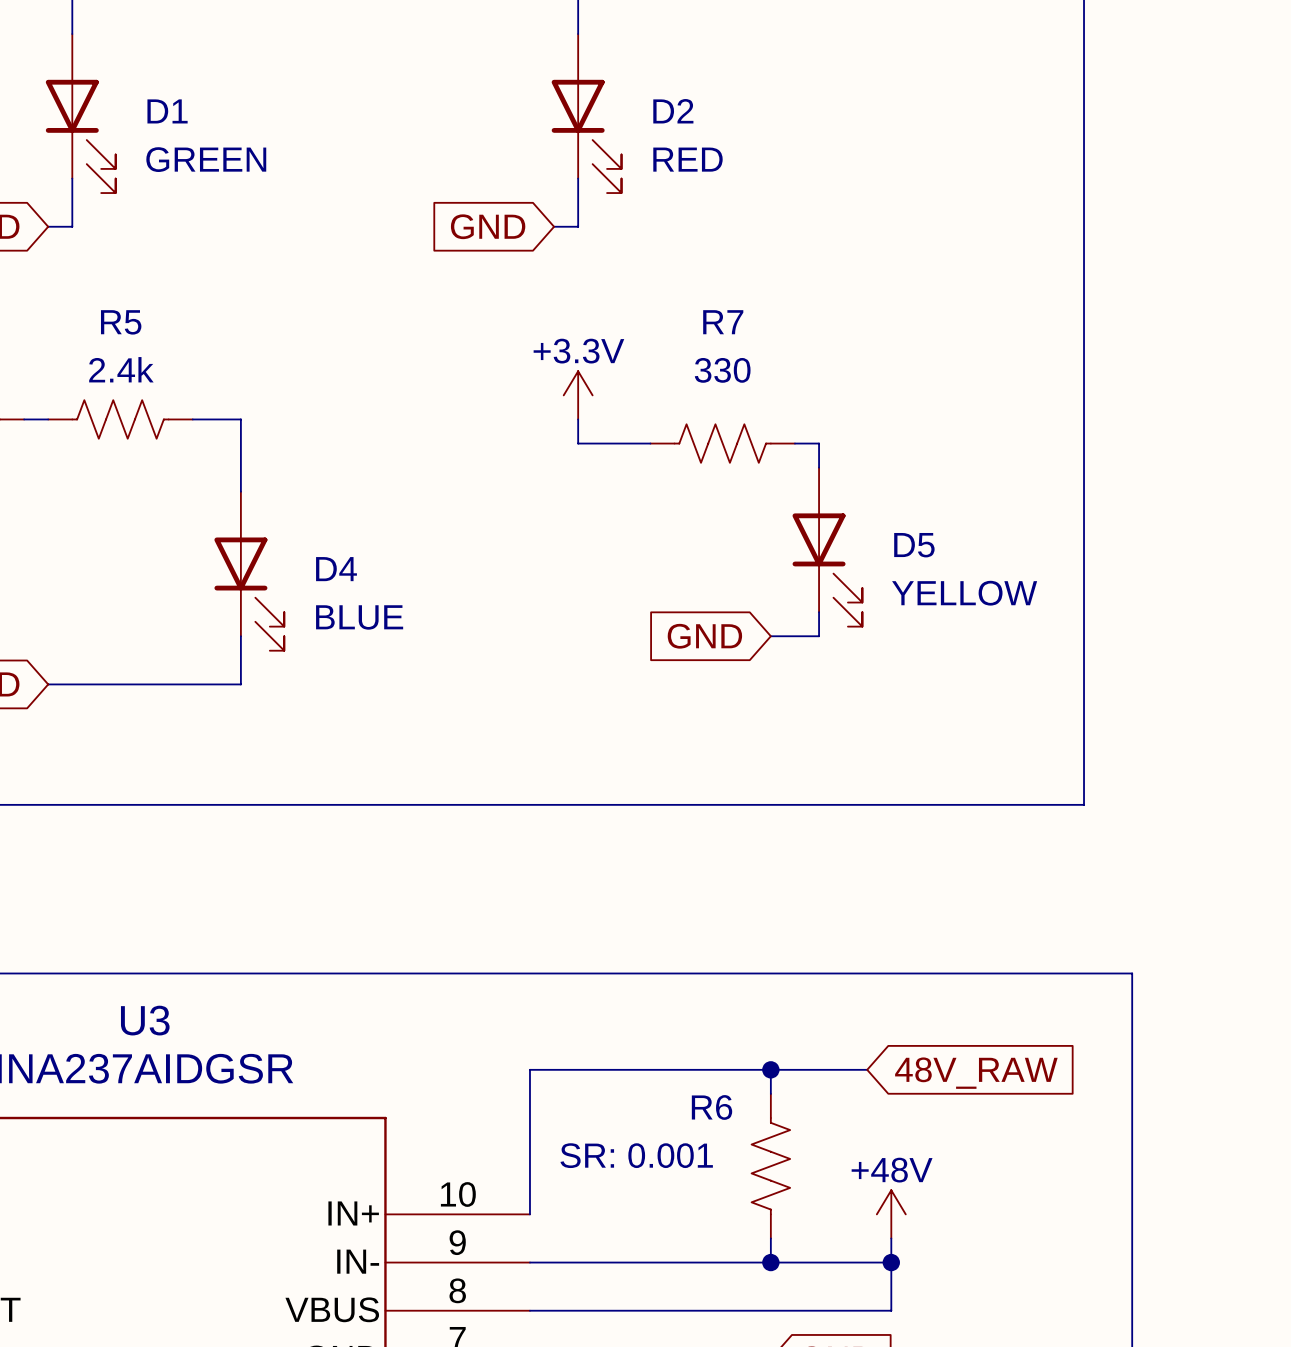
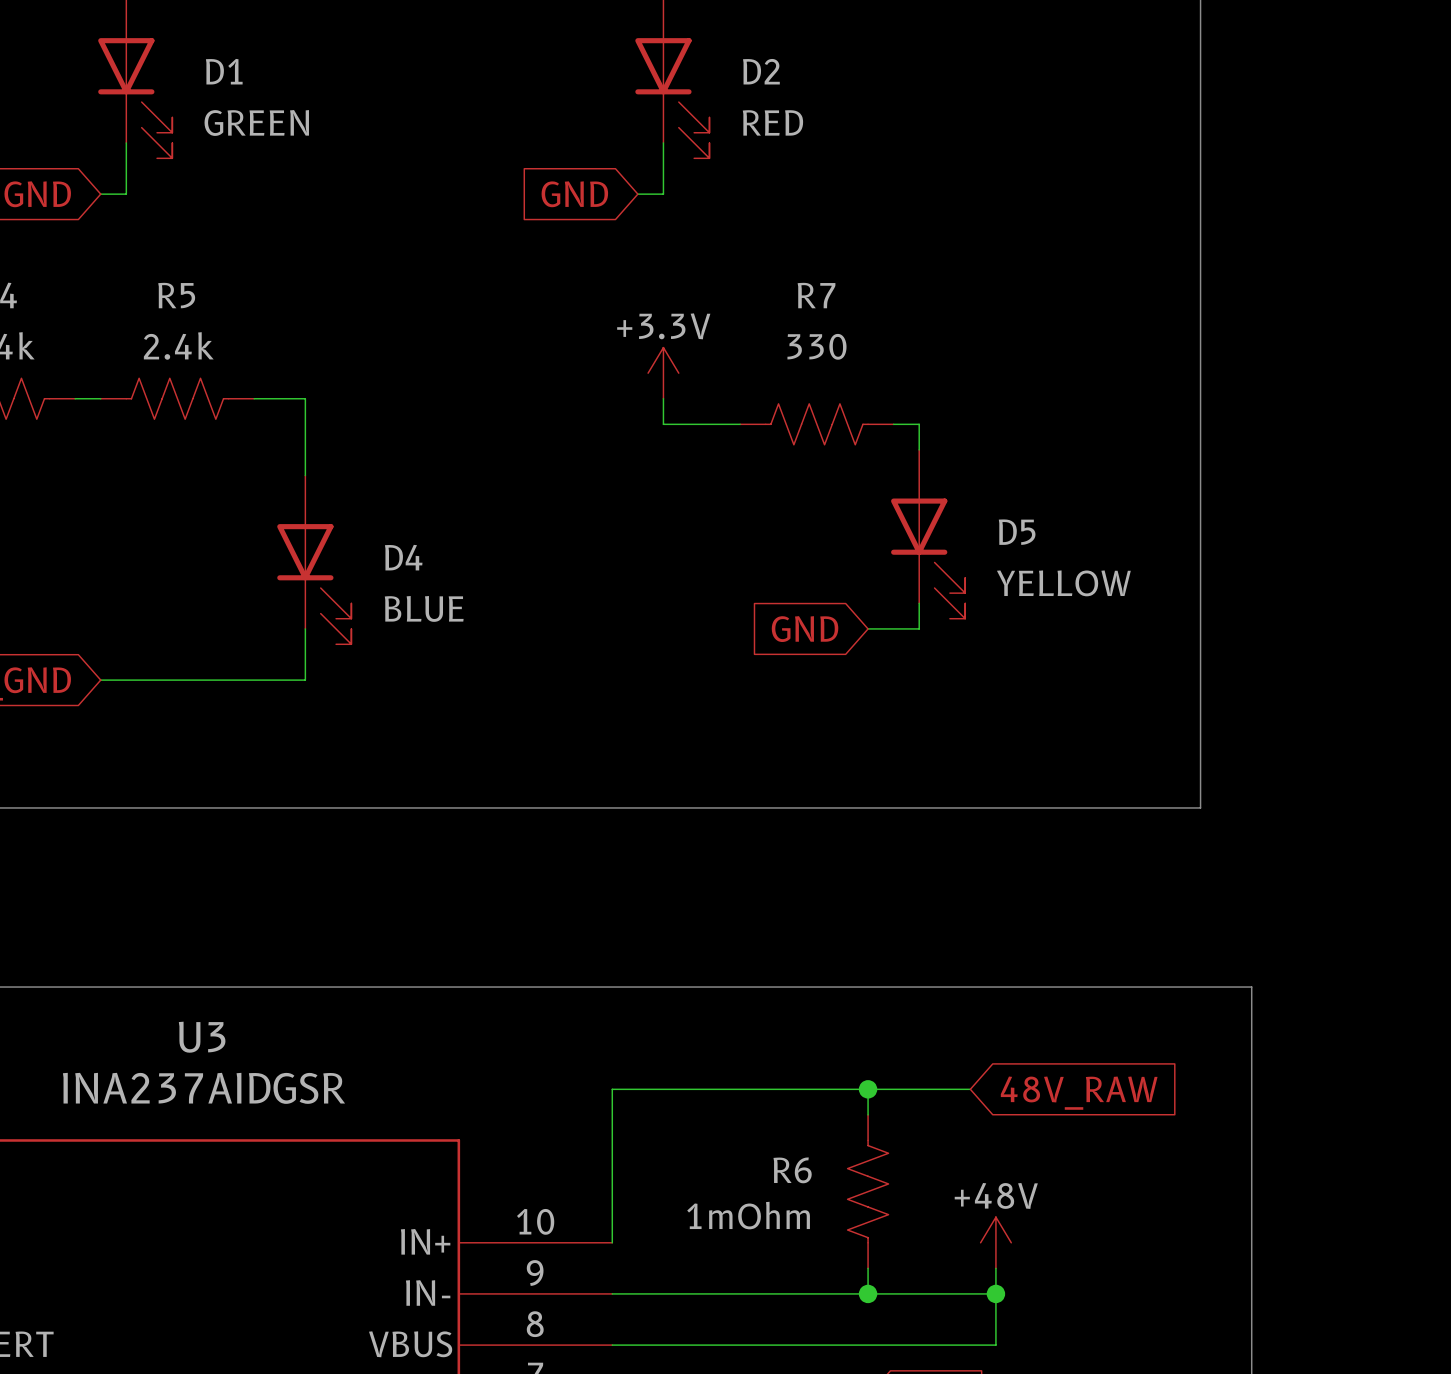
R6 name position: R6 (712, 1107) -> R6 (792, 1170)
R6 value: SR: 0.001 (636, 1155) -> 1mOhm (748, 1215)

